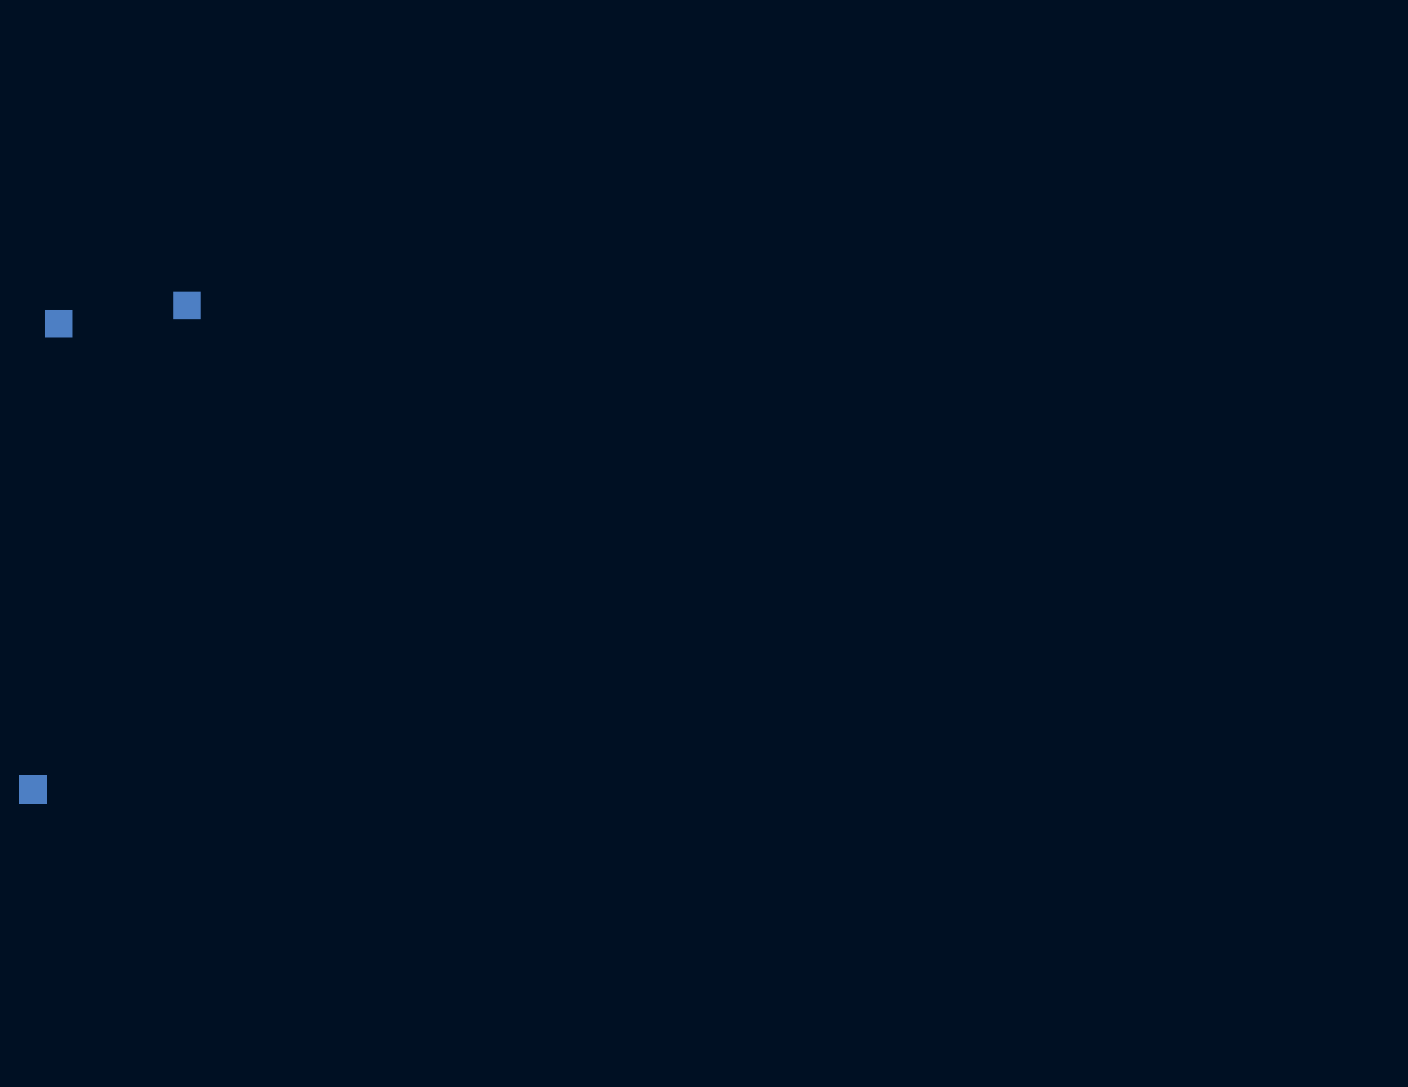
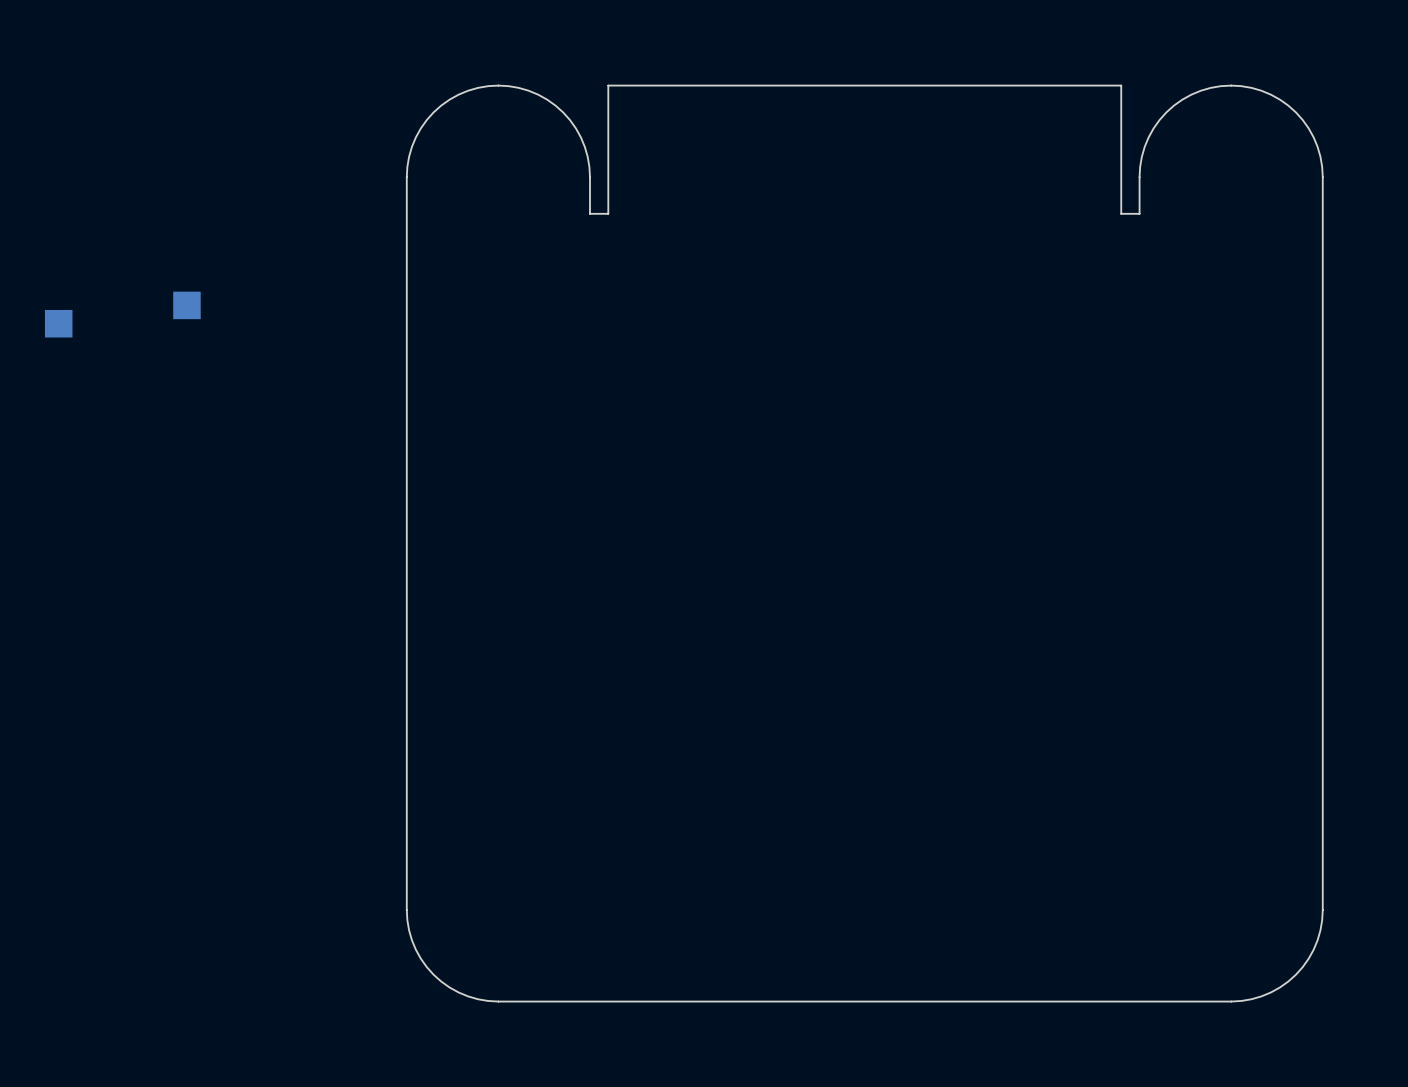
board edge: none -> (498, 85) (518, 87) (538, 94) (555, 105) (570, 120) (580, 137) (587, 156) (589, 213) (608, 213) (608, 85) (1121, 85) (1121, 213) (1139, 213) (1140, 166) (1148, 137) (1166, 112) (1191, 94) (1220, 86) (1251, 87) (1279, 99) (1302, 120) (1317, 146) (1322, 177) (1322, 909) (1320, 930) (1313, 949) (1302, 967) (1288, 981) (1261, 996) (1231, 1001) (498, 1001) (478, 999) (458, 992) (441, 981) (426, 967) (411, 940) (406, 909) (407, 166) (415, 137) (433, 112) (449, 99) (468, 90) (498, 85)
part: (33, 789) -> none

